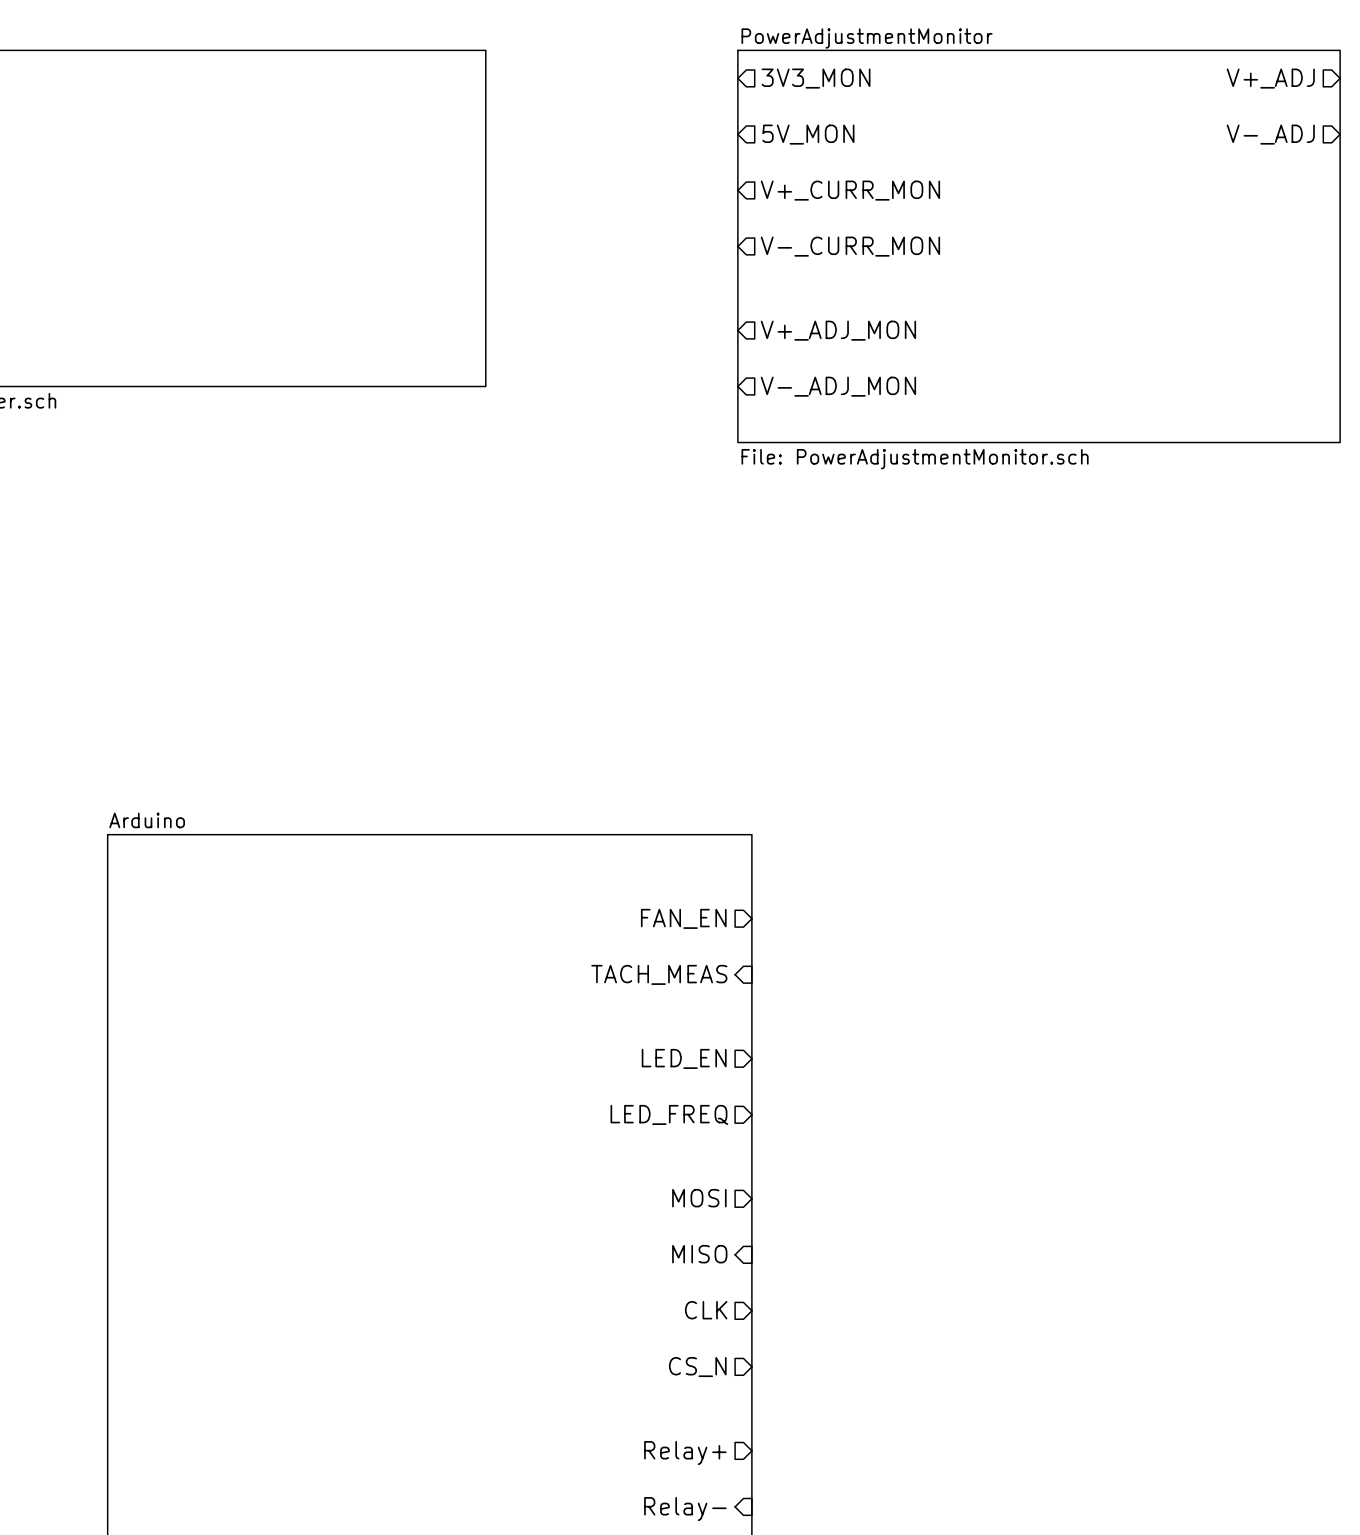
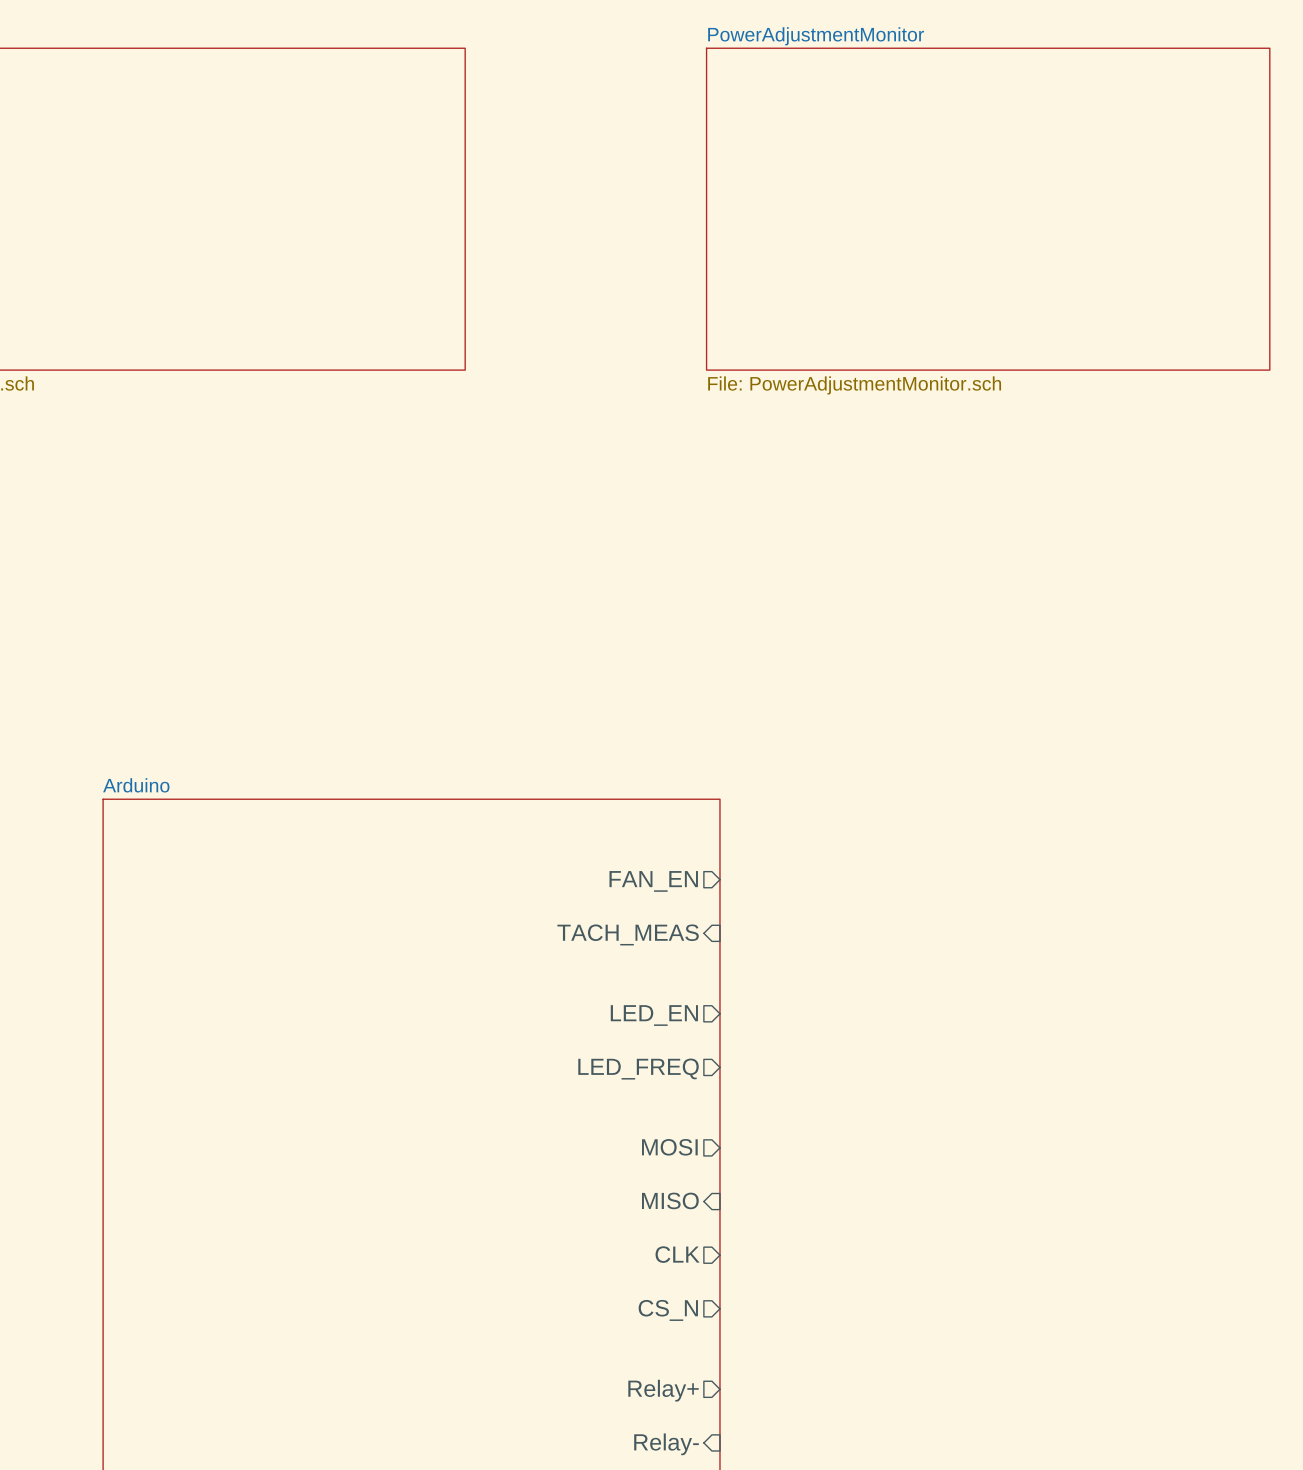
sheet pin: 3V3_MON (816, 78) -> none
sheet pin: V+_ADJ (1270, 78) -> none
sheet pin: 5V_MON (808, 134) -> none
sheet pin: V-_ADJ (1270, 134) -> none
sheet pin: V+_CURR_MON (850, 190) -> none
sheet PowerAdjustmentMonitor: none -> File: PowerAdjustmentMonitor.sch (988, 209)
sheet pin: V-_CURR_MON (850, 246) -> none
sheet PowerAdjustmentMonitor: File: PowerAdjustmentMonitor.sch (1039, 246) -> none
sheet pin: V+_ADJ_MON (838, 330) -> none
sheet pin: V-_ADJ_MON (838, 386) -> none

